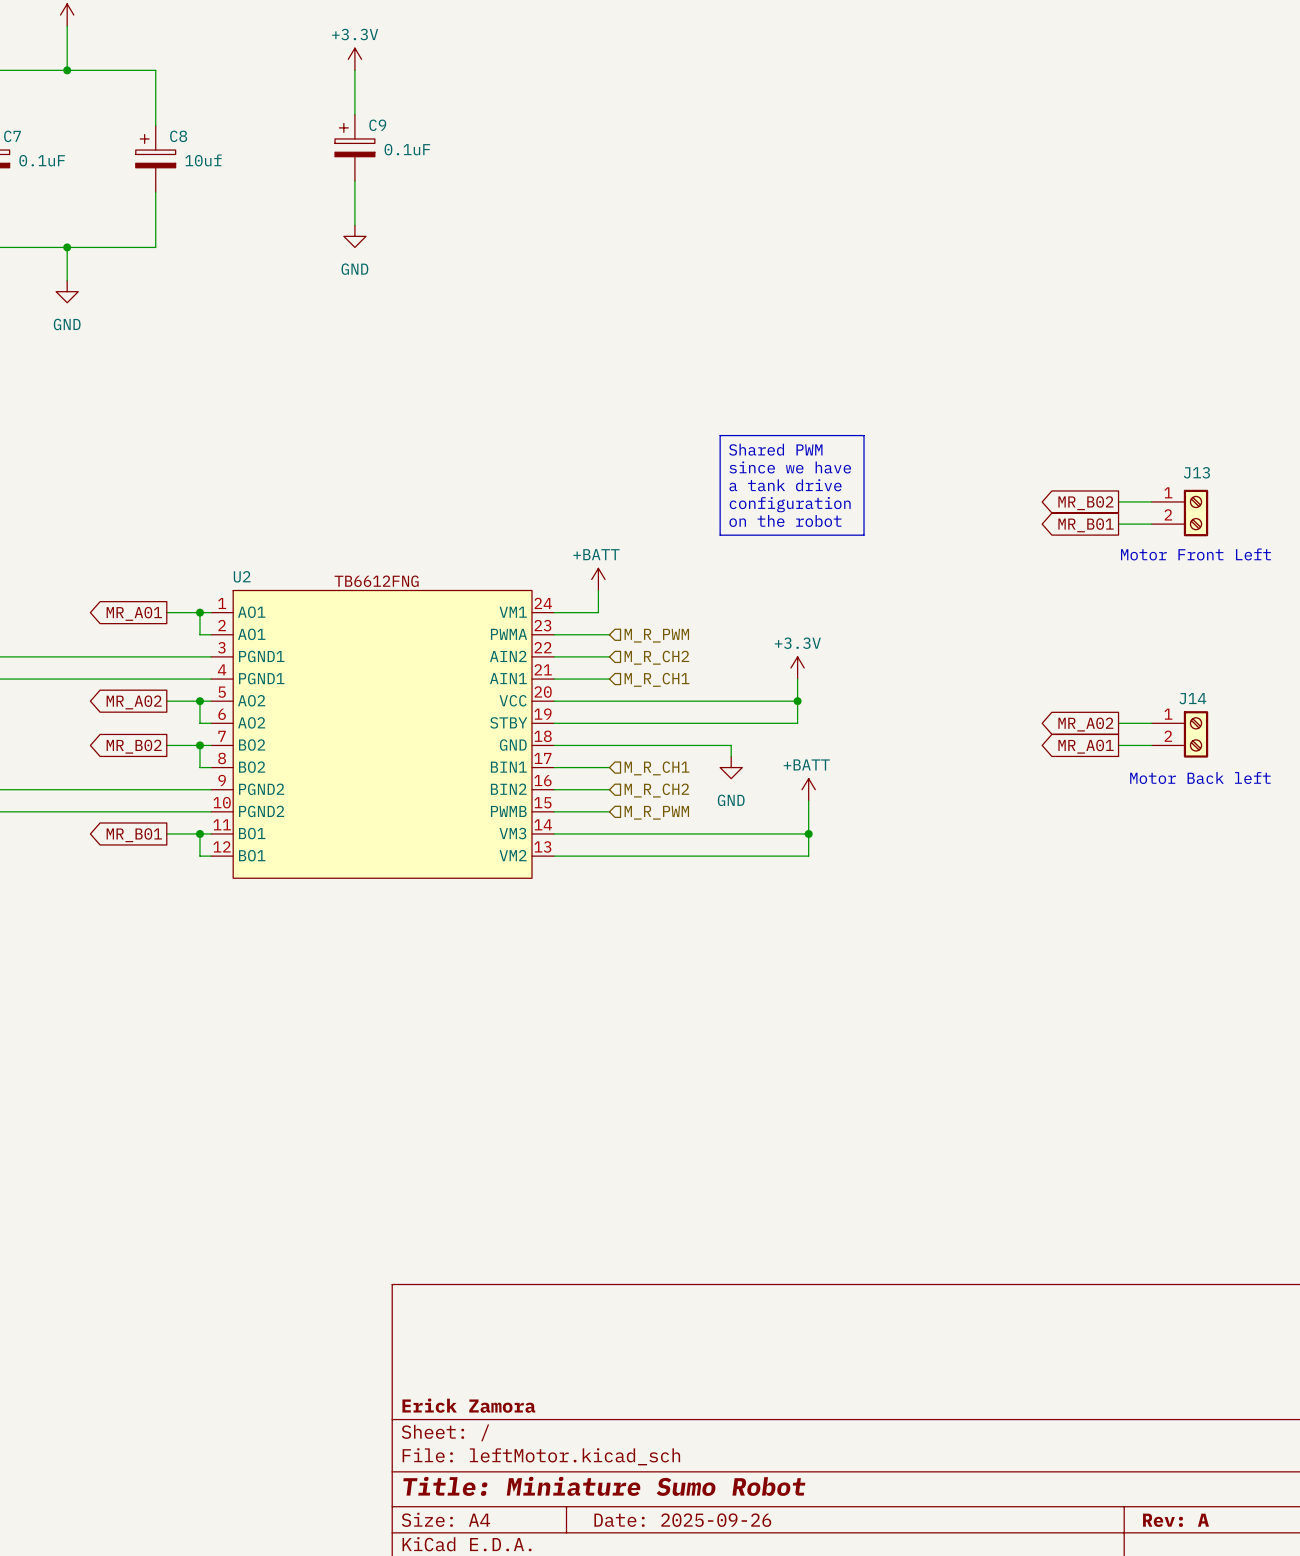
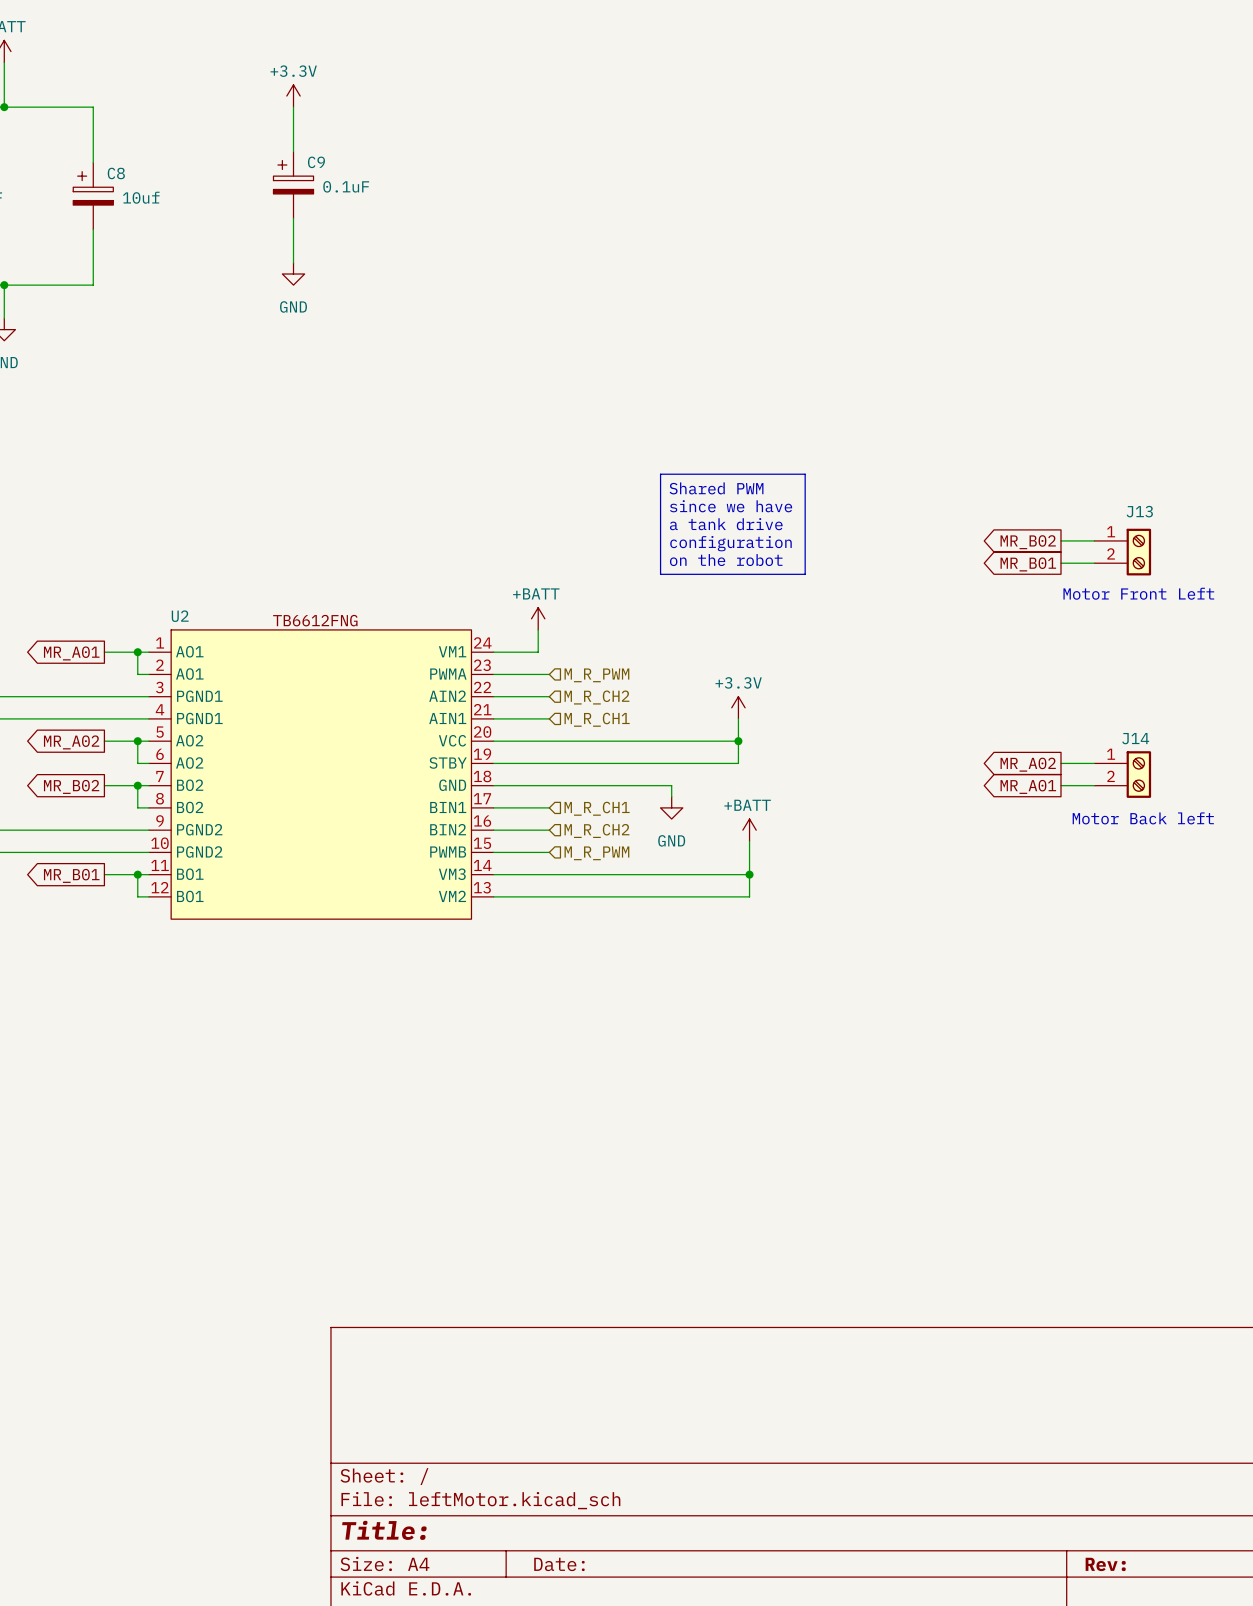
title block: Erick Zamora (468, 1405) -> none
title block: Title: Miniature Sumo Robot (604, 1486) -> Title: (384, 1530)
title block: Date: 2025-09-26 (682, 1520) -> Date: (559, 1564)
title block: Rev: A (1176, 1520) -> Rev: (1105, 1564)

